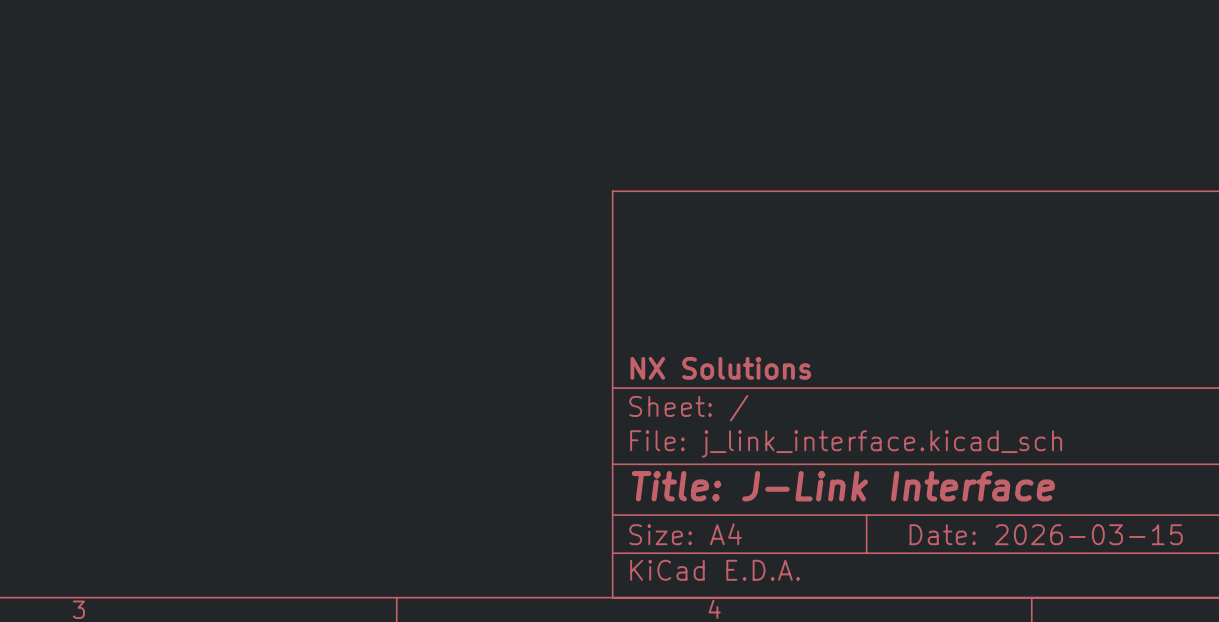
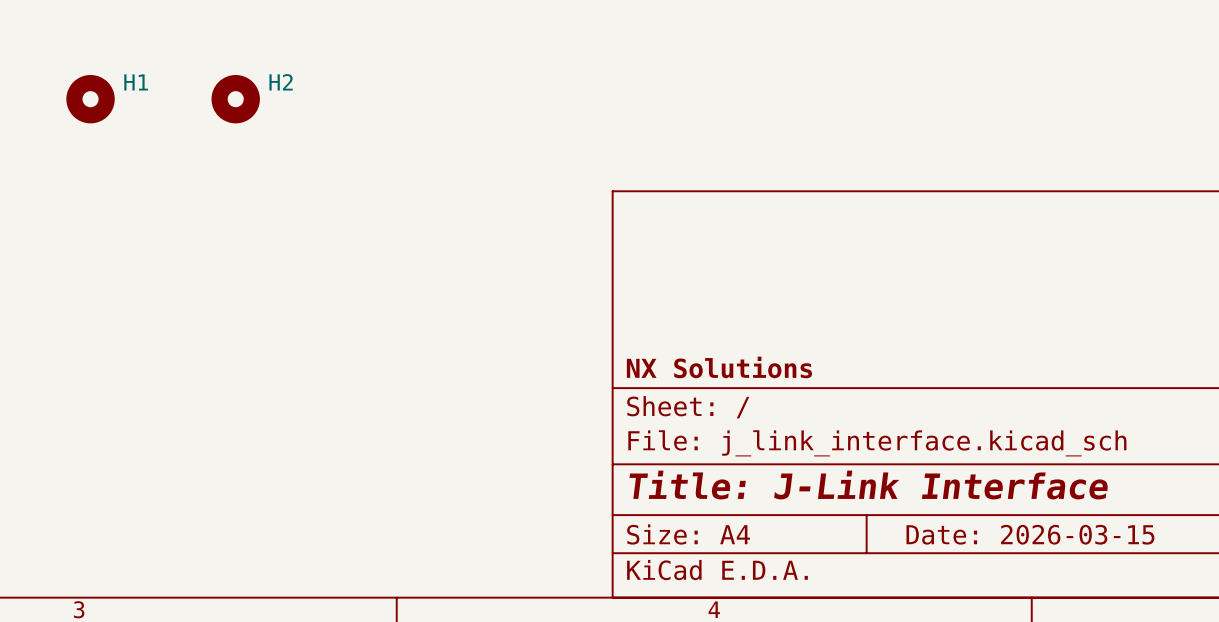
H1: none -> (90, 99)
H2: none -> (235, 99)

